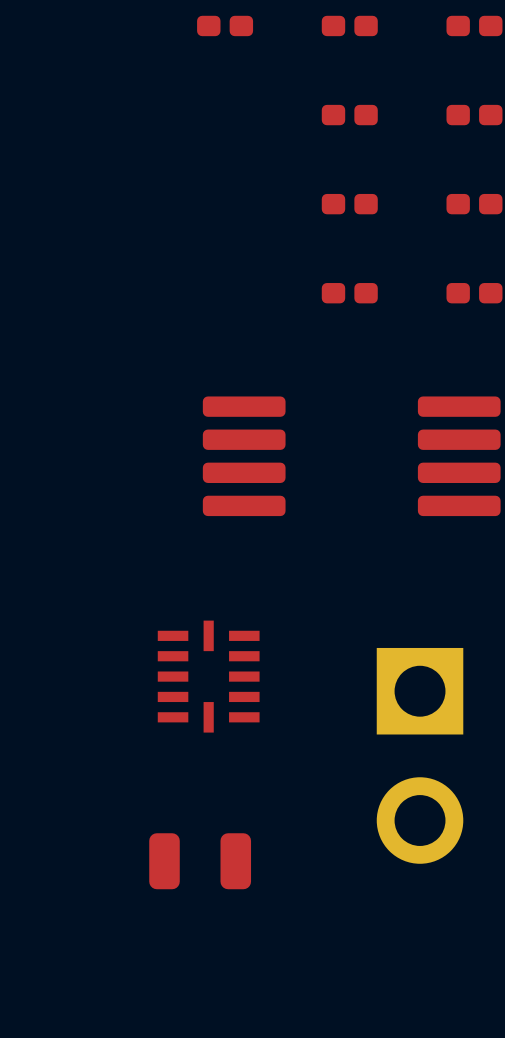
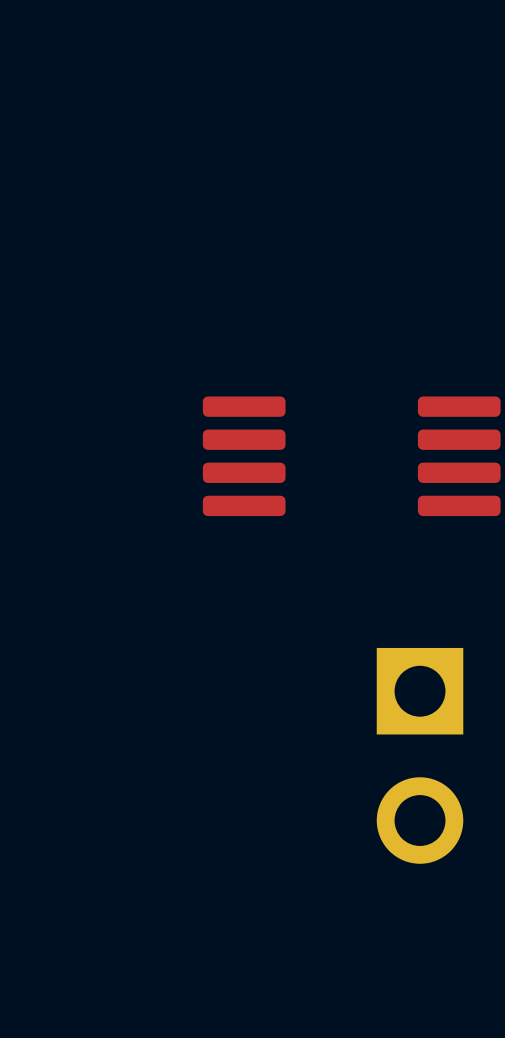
part: (225, 25) -> none
part: (349, 25) -> none
part: (474, 25) -> none
part: (349, 115) -> none
part: (474, 115) -> none
part: (349, 204) -> none
part: (474, 204) -> none
part: (349, 293) -> none
part: (474, 293) -> none
part: (208, 676) -> none
part: (200, 861) -> none

